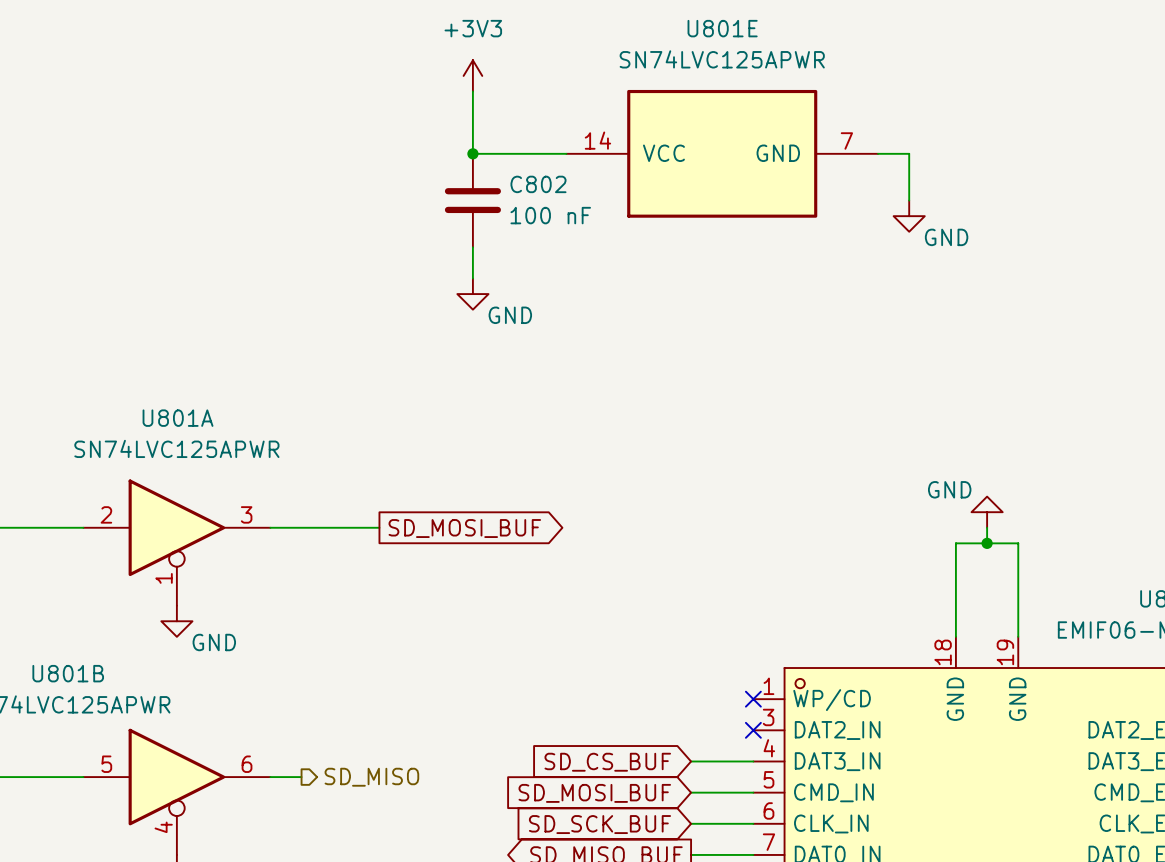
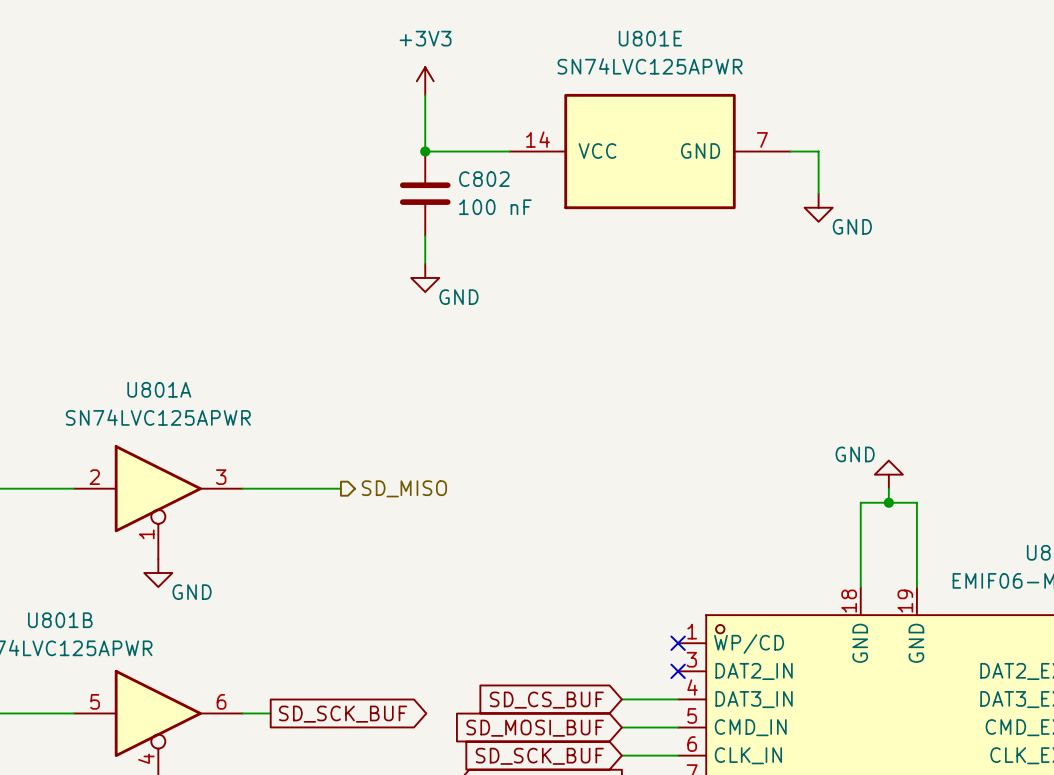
global label: SD_MOSI_BUF (464, 528) -> none
hierarchical label position: SD_MISO (371, 777) -> SD_MISO (404, 488)
global label: none -> SD_SCK_BUF (342, 714)

